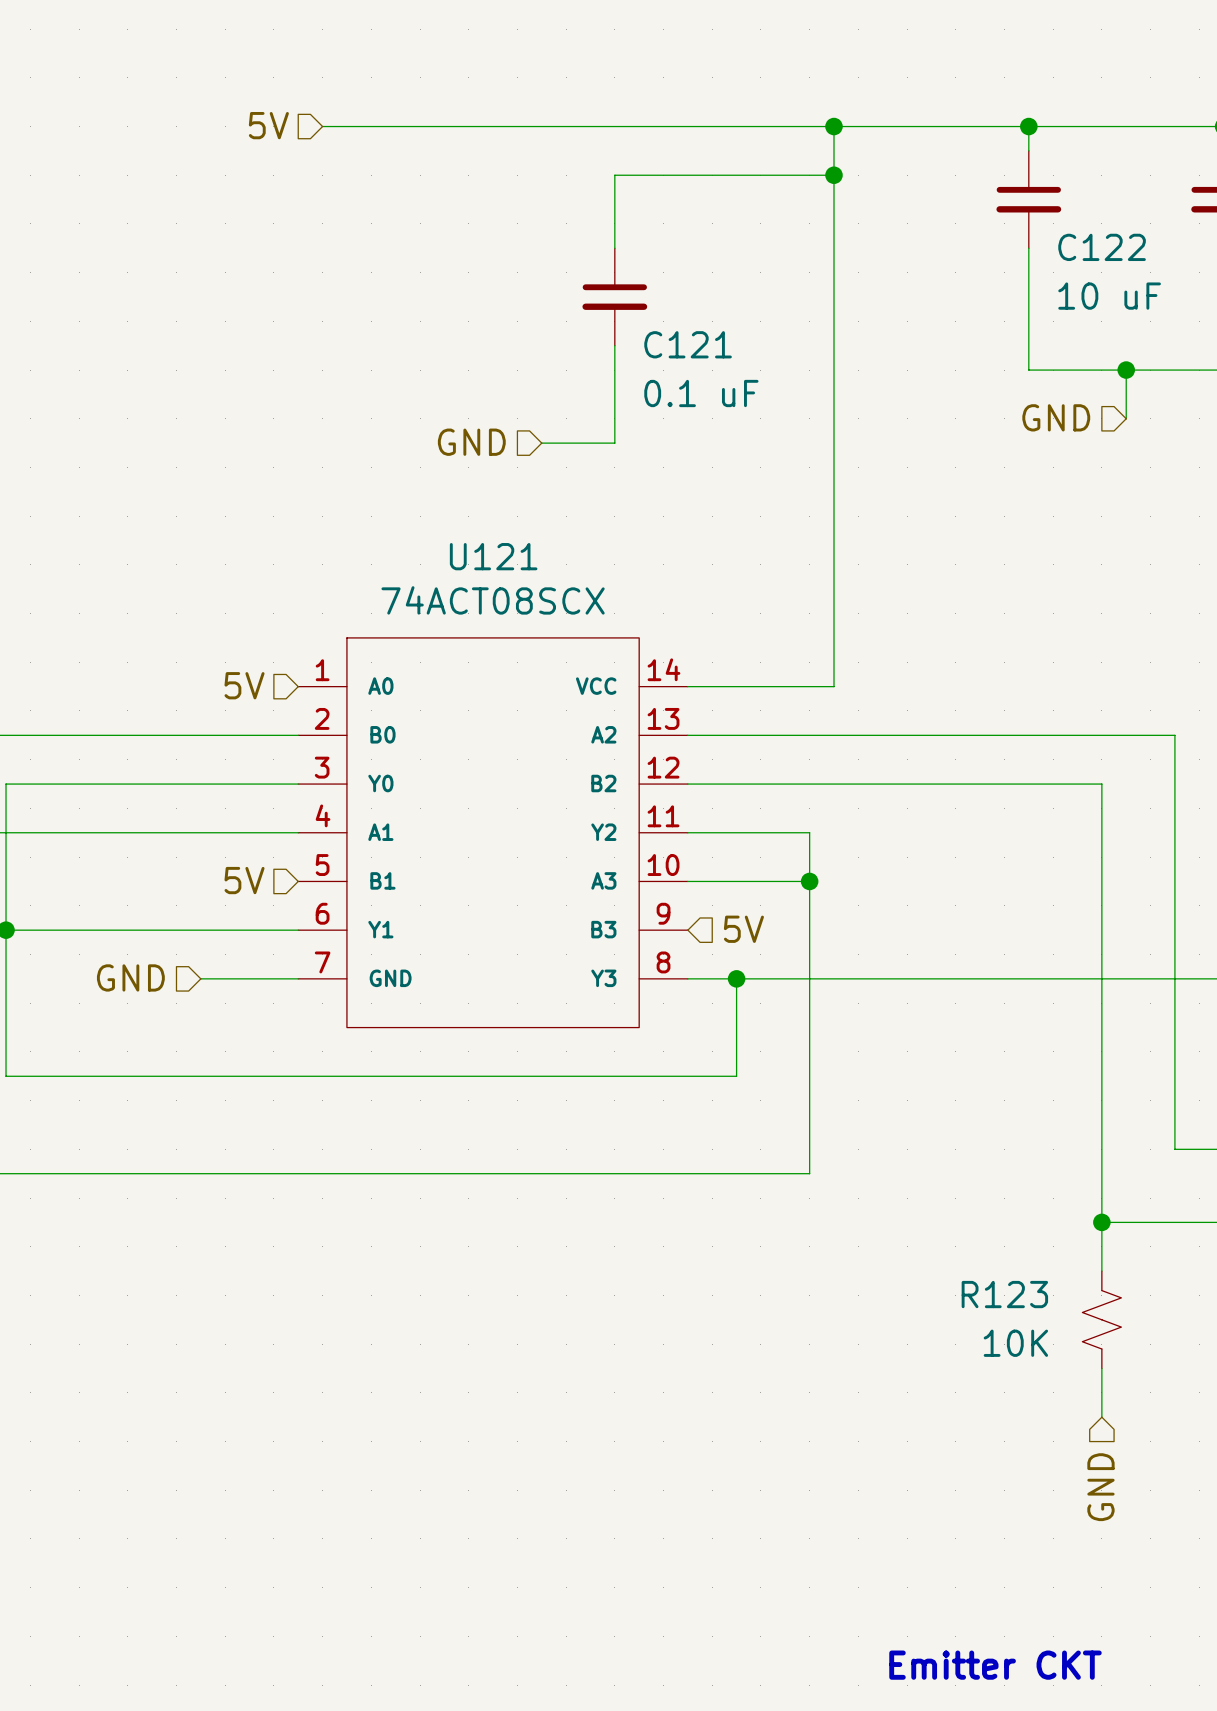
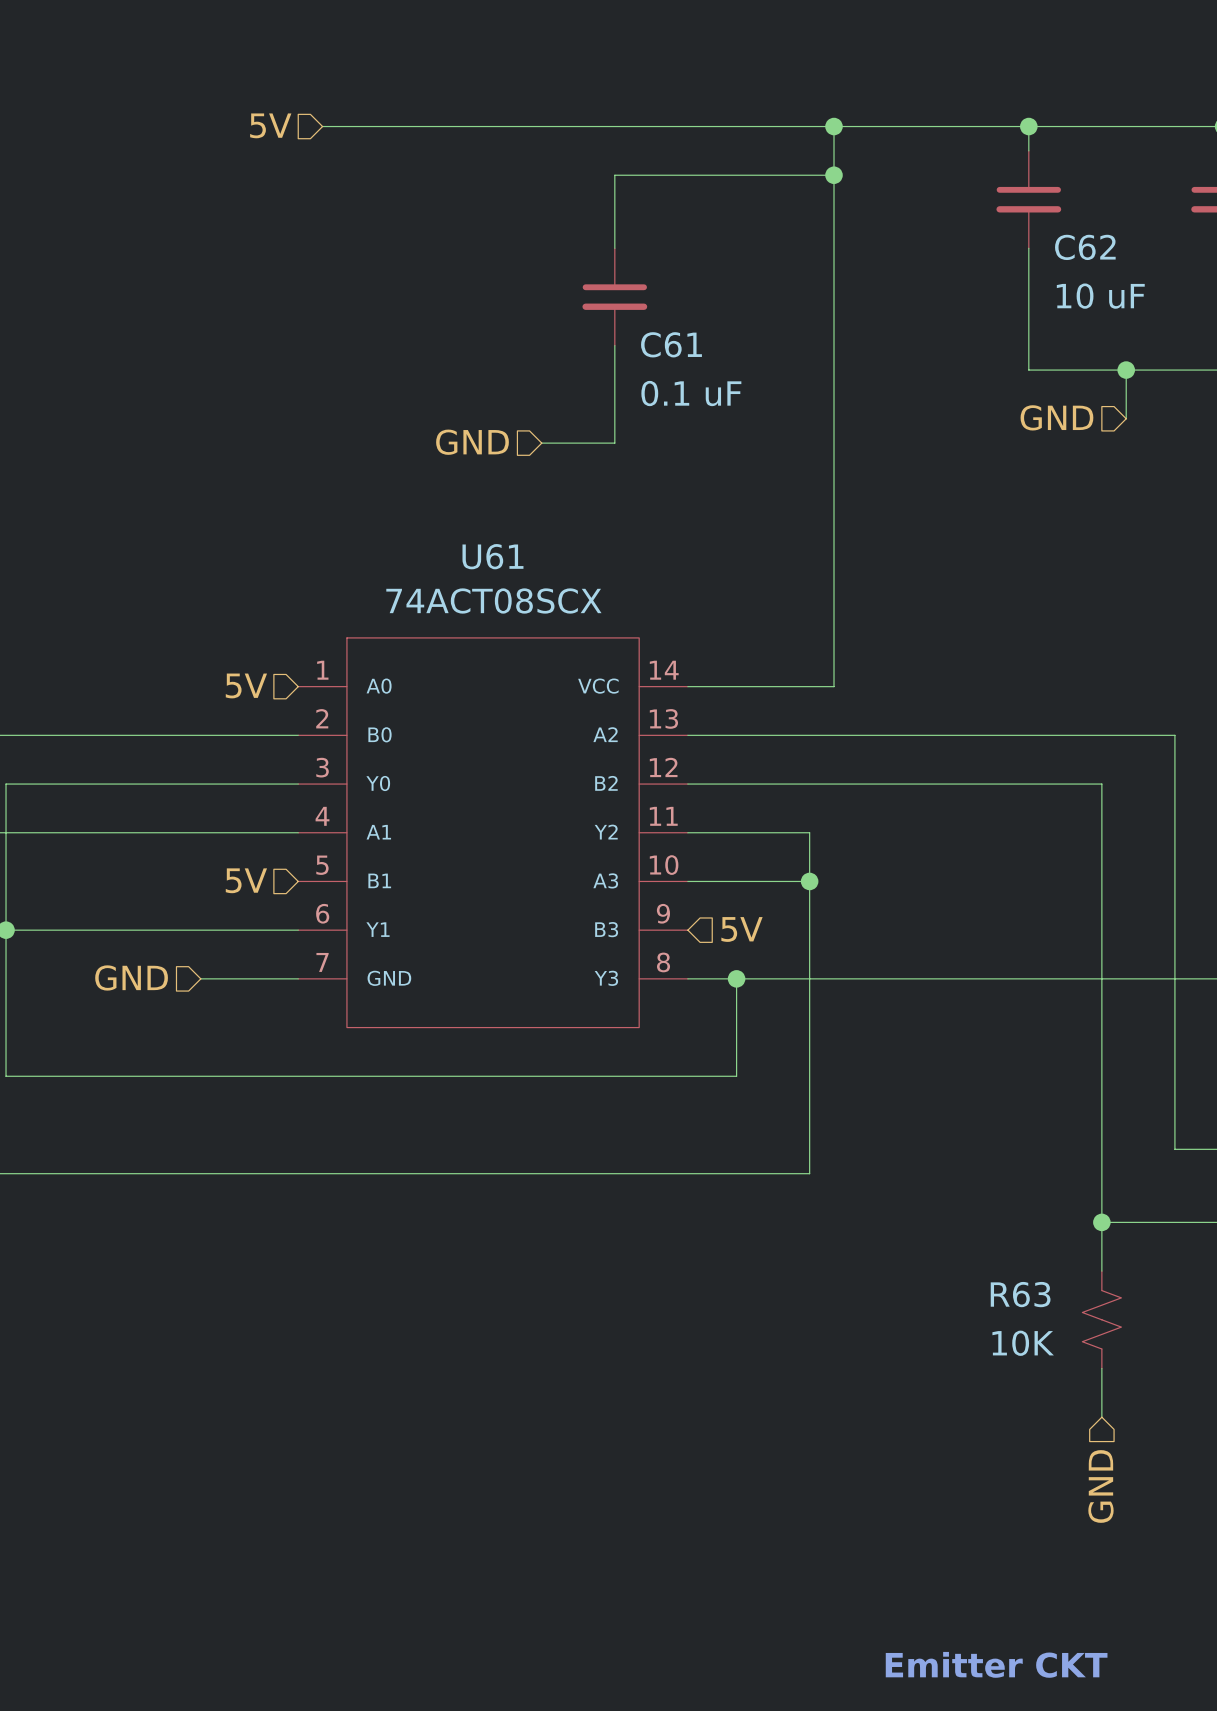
C122 name: C122 (1102, 247) -> C62 (1085, 247)
C121 name: C121 (688, 344) -> C61 (671, 344)
U121 name: U121 (493, 556) -> U61 (492, 556)
R123 name: R123 (1004, 1294) -> R63 (1020, 1294)

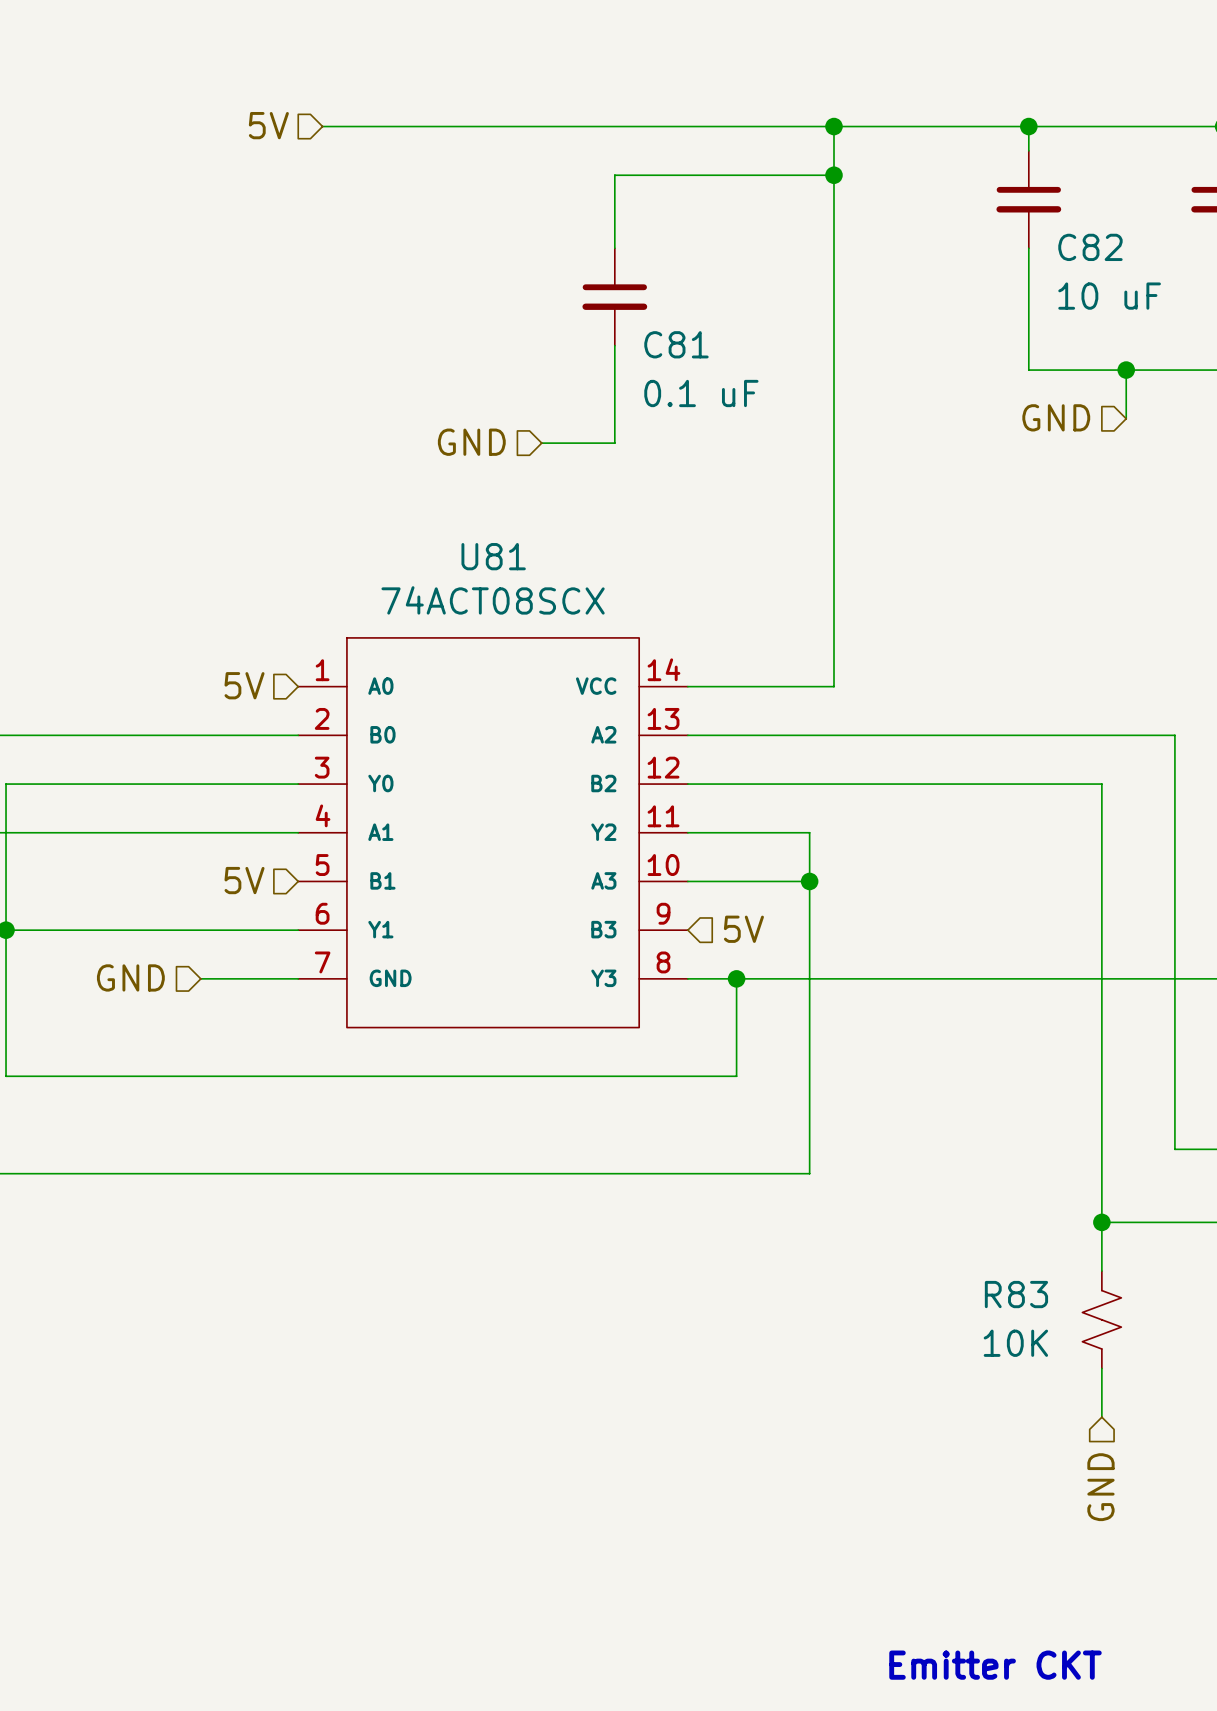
C62 name: C62 (1085, 247) -> C82 (1090, 247)
C61 name: C61 (671, 344) -> C81 (676, 344)
U61 name: U61 (492, 556) -> U81 (493, 556)
R63 name: R63 (1020, 1294) -> R83 (1016, 1294)

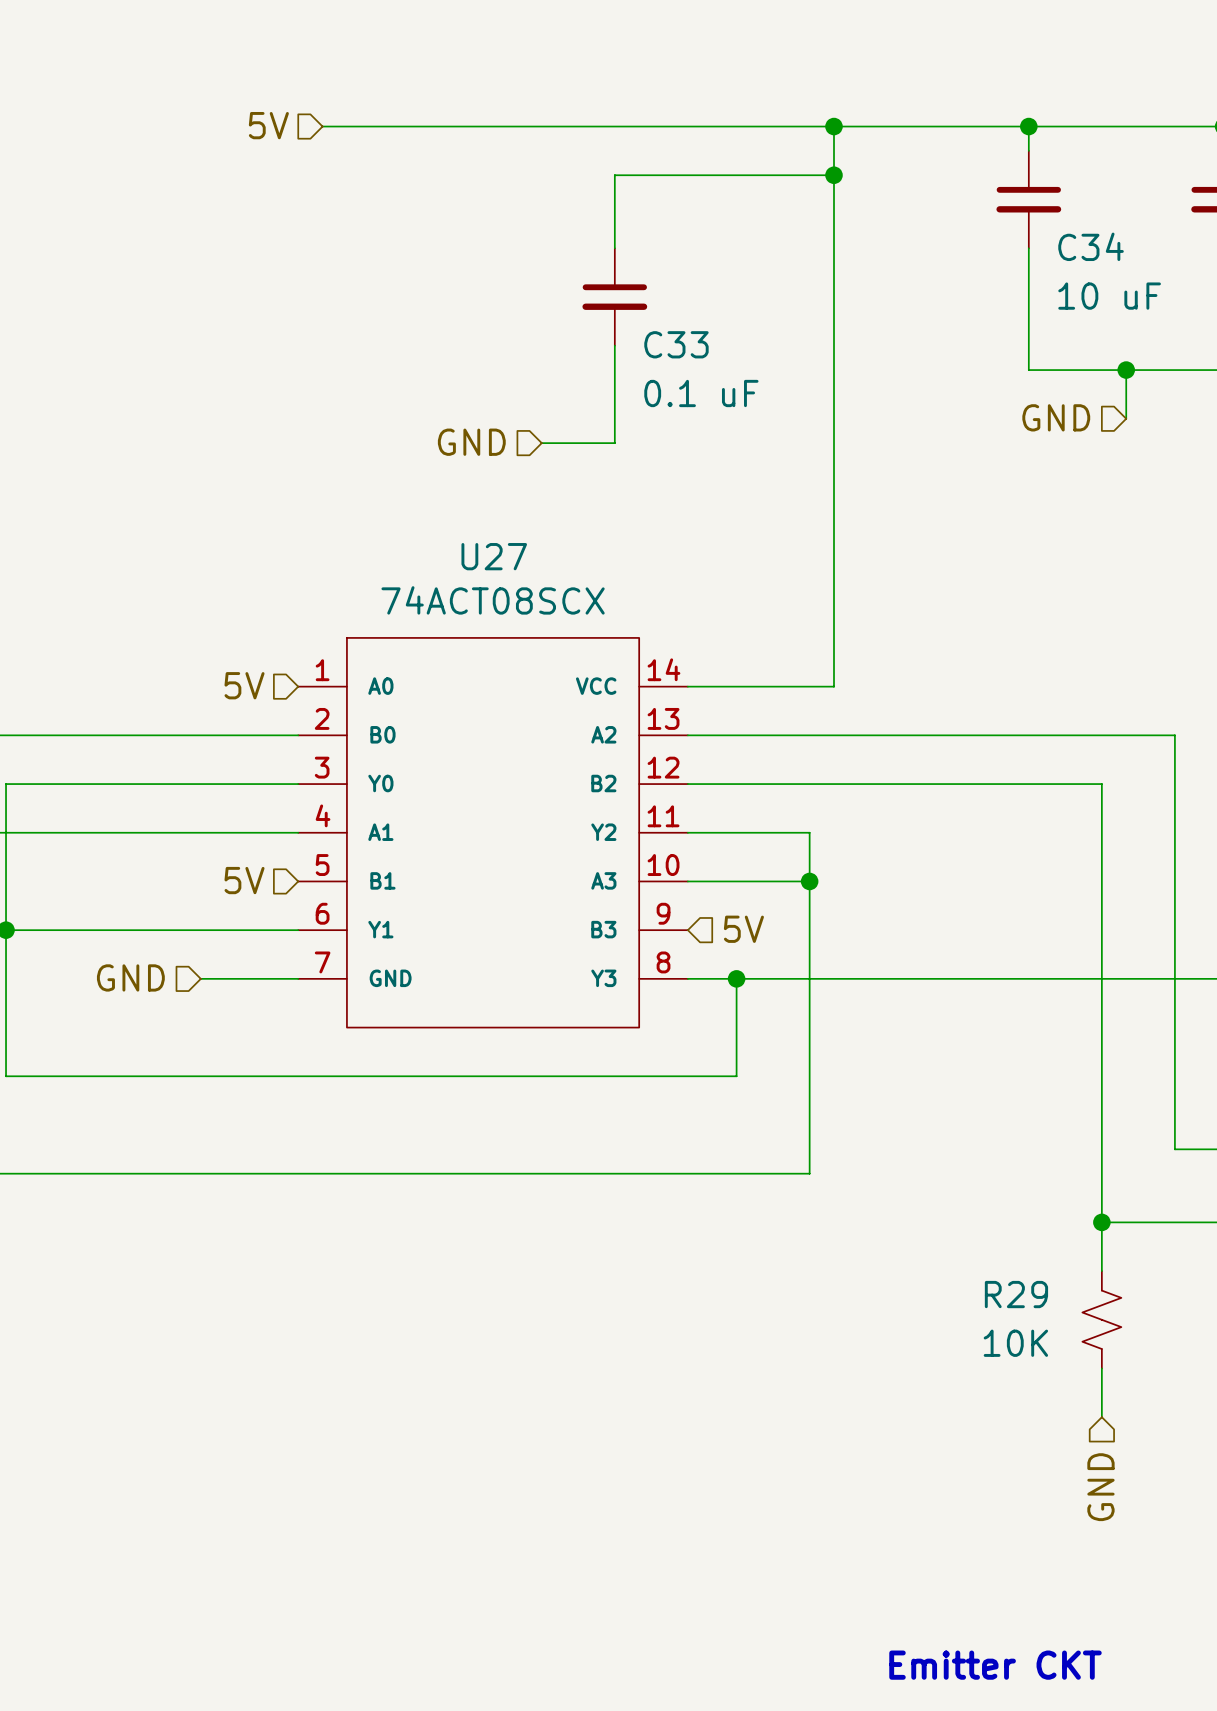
C82 name: C82 (1090, 247) -> C34 (1091, 246)
C81 name: C81 (676, 344) -> C33 (676, 344)
U81 name: U81 (493, 556) -> U27 (494, 556)
R83 name: R83 (1016, 1294) -> R29 (1016, 1294)

